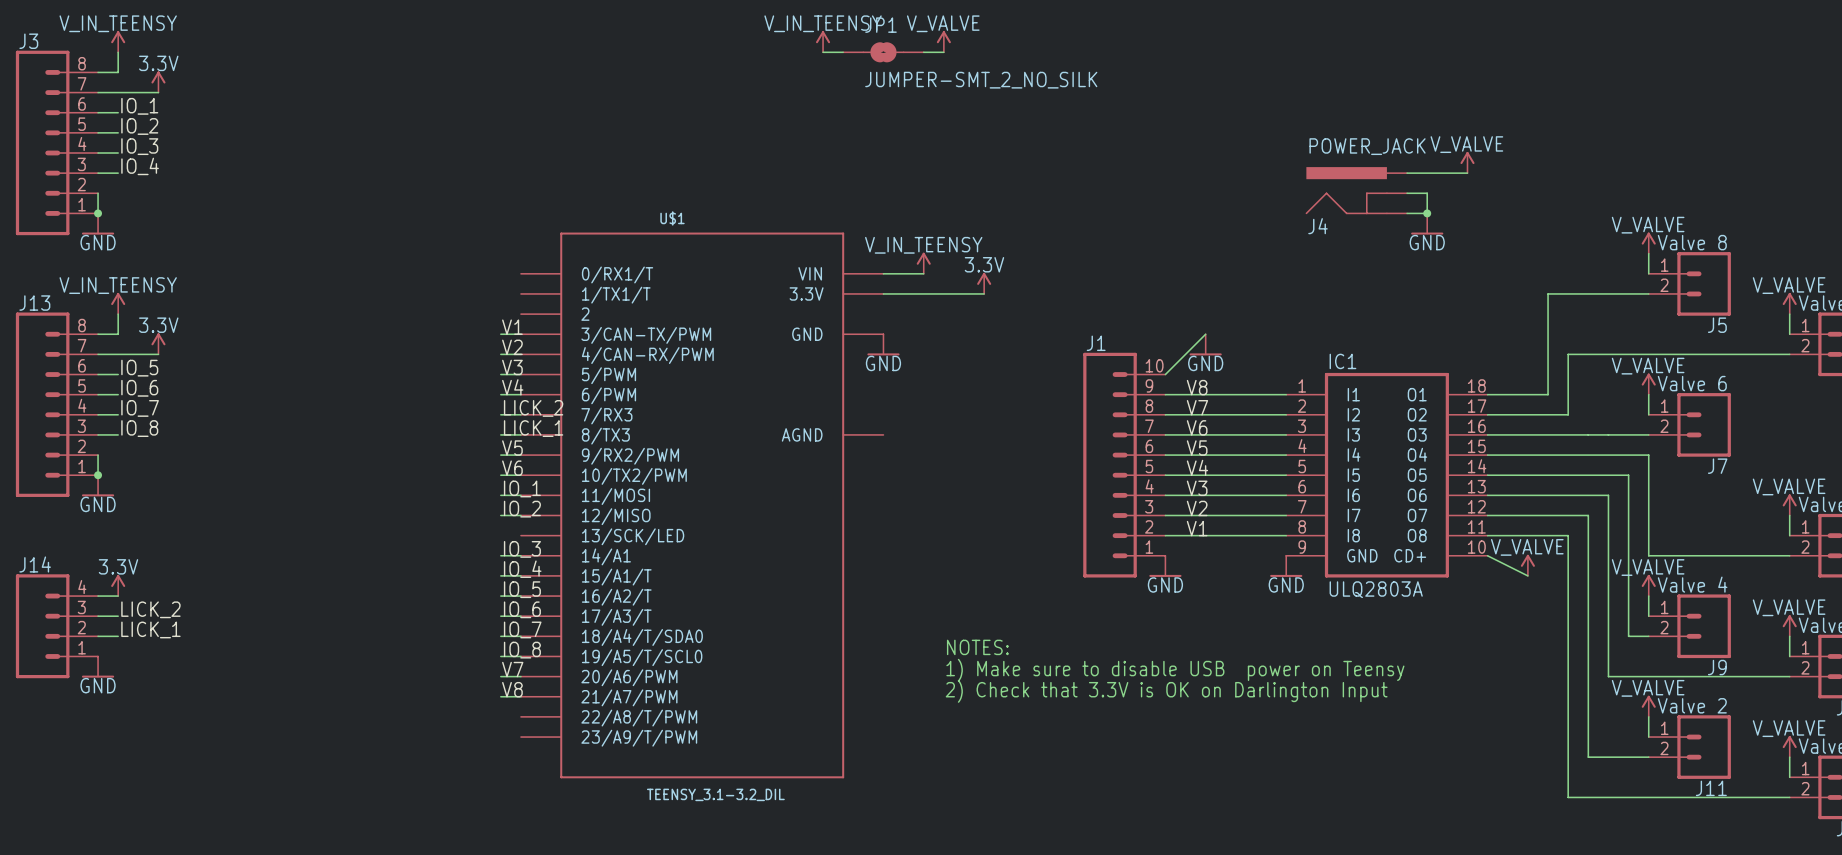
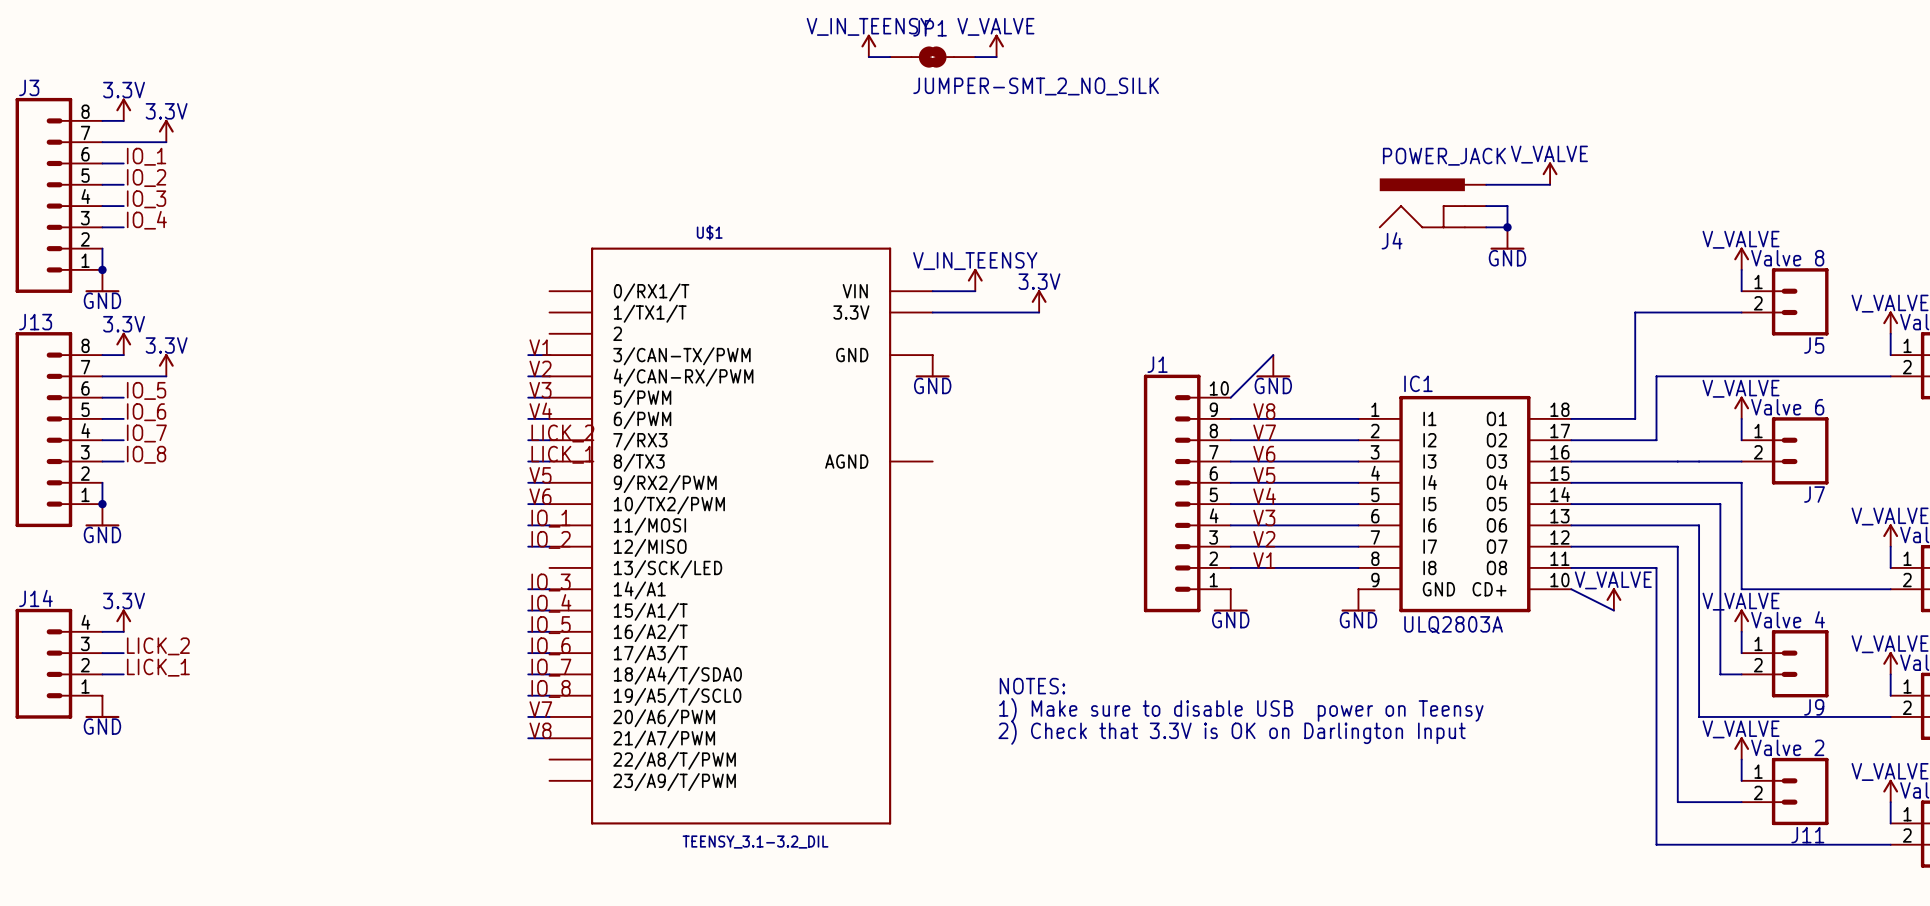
power symbol: V_IN_TEENSY (118, 41) -> none
wire: (118, 52) (118, 72) (98, 72) -> none
power symbol: 3.3V (158, 82) -> none
wire: (98, 92) (158, 92) -> none
power symbol: none -> 3.3V (123, 109)
label: IO_1 (139, 106) -> none
power symbol: none -> 3.3V (166, 131)
label: IO_2 (139, 126) -> none
wire: none -> (123, 142) (166, 142)
J3 position: (56, 142) -> (59, 195)
label: IO_3 (139, 146) -> IO_1 (146, 156)
label: IO_4 (140, 166) -> IO_2 (146, 178)
label: none -> IO_3 (146, 199)
wire: (98, 193) (98, 213) -> (102, 206) (123, 206)
label: none -> IO_4 (146, 220)
wire: none -> (102, 227) (123, 227)
junction position: (98, 213) -> (102, 269)
power symbol position: GND (98, 223) -> GND (102, 281)
power symbol: V_IN_TEENSY (118, 303) -> none
power symbol: none -> 3.3V (123, 343)

